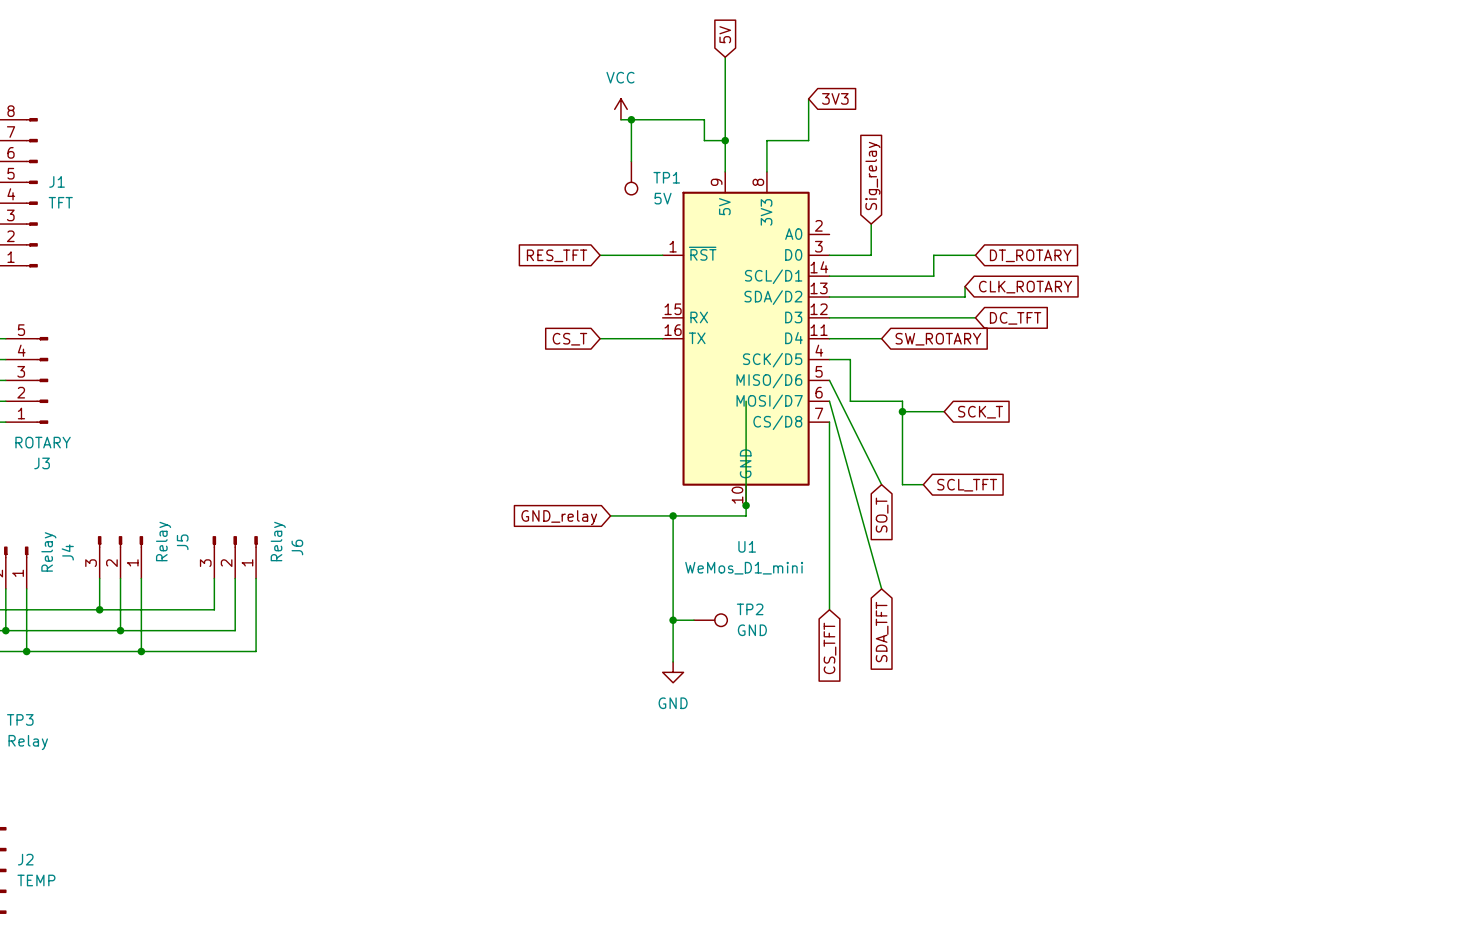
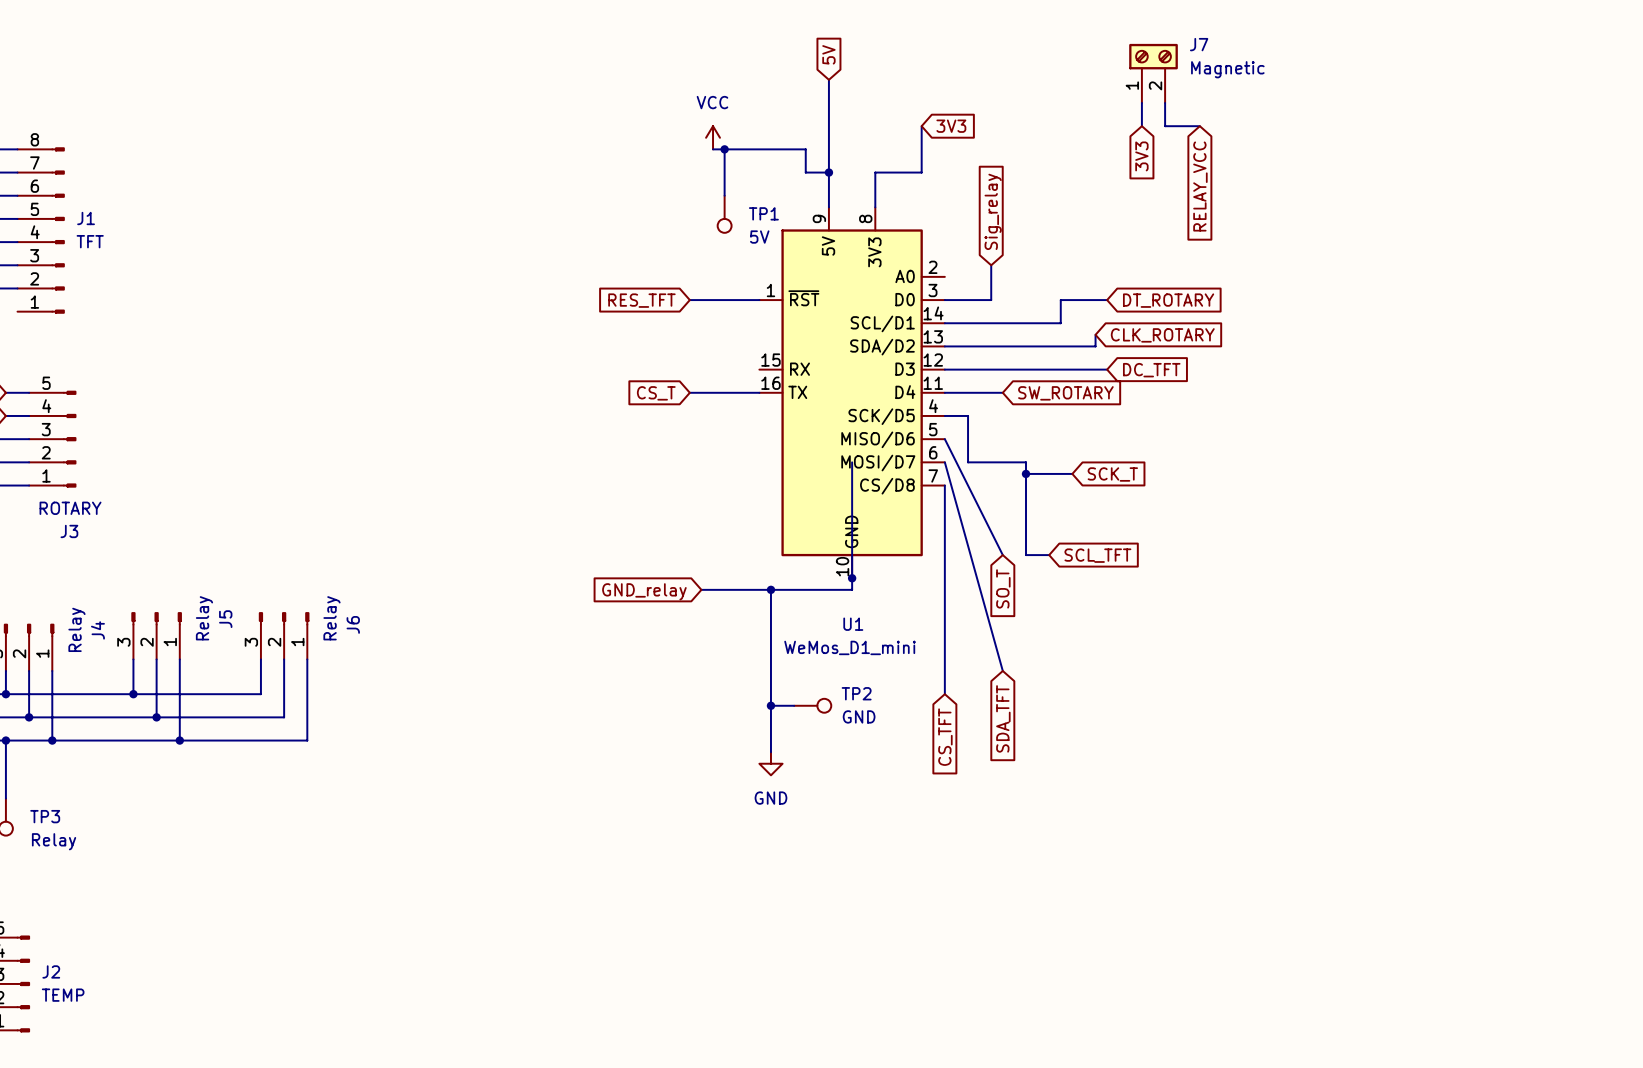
J7: none -> Magnetic (1153, 73)
wire: none -> (1141, 103) (1141, 126)
wire: none -> (1165, 103) (1165, 126) (1199, 126)
global label: none -> 3V3 (1141, 156)
global label: none -> RELAY_VCC (1200, 186)

